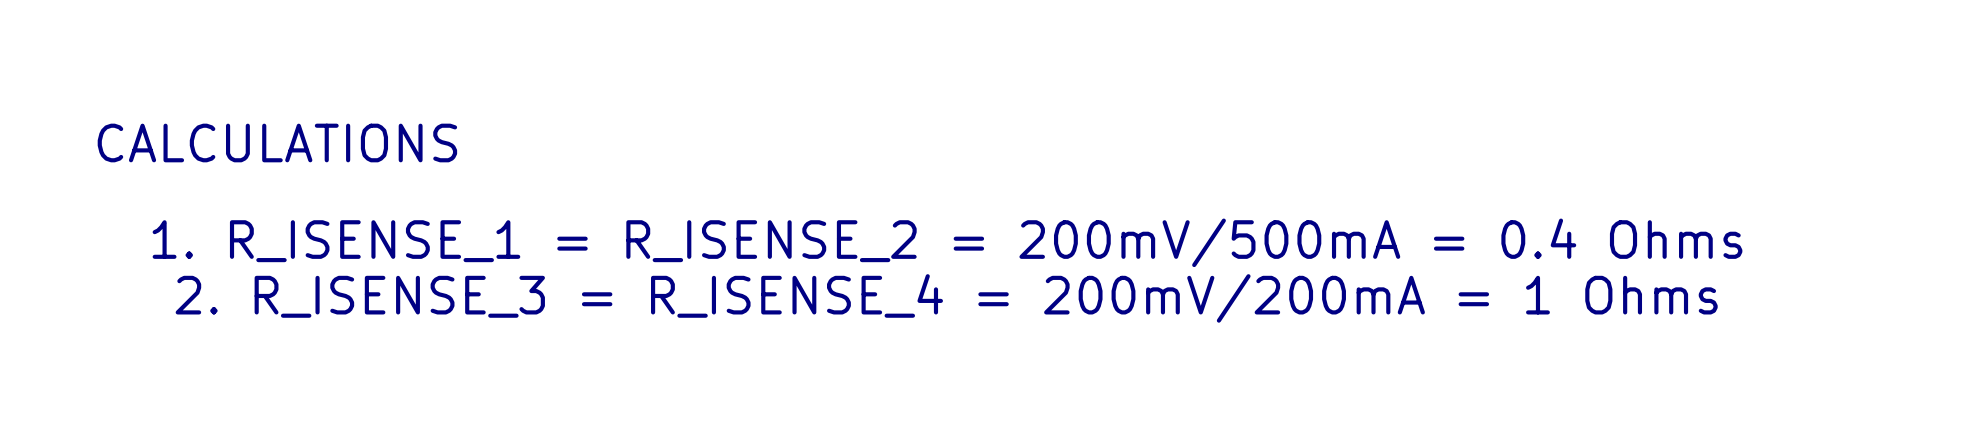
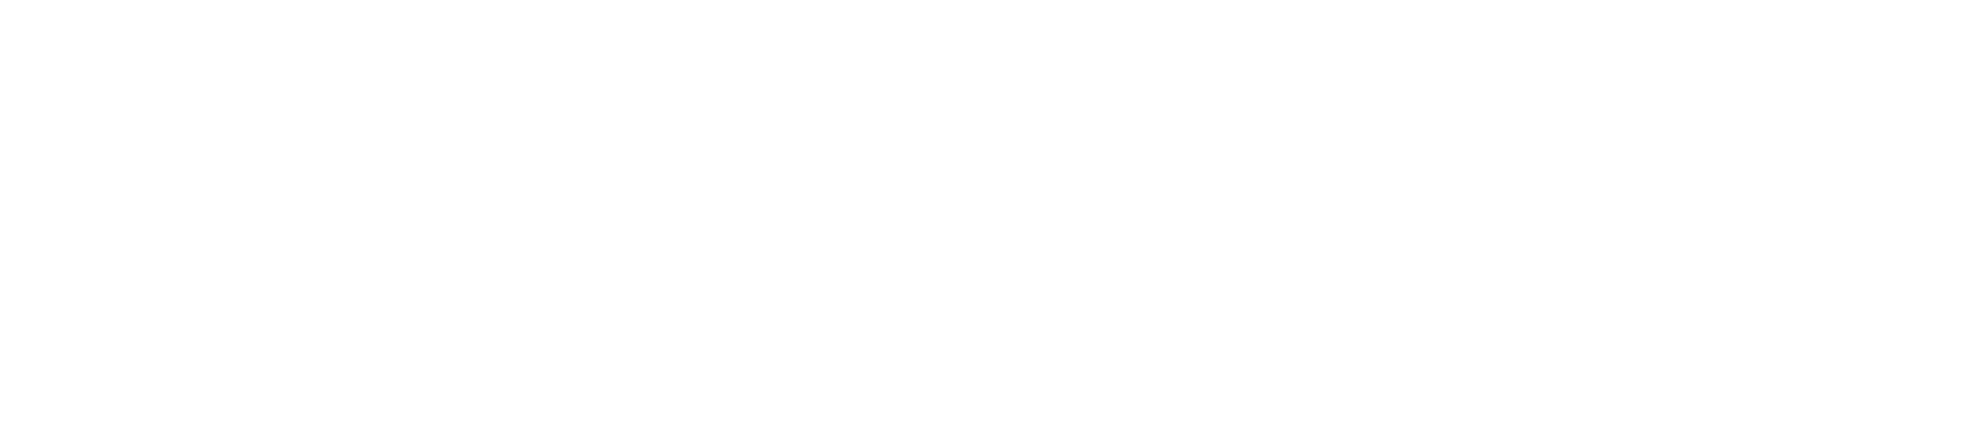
text: CALCULATIONS (277, 142) -> none
text: 1. R_ISENSE_1 = R_ISENSE_2 = 200mV/500mA = 0.4 Ohms (947, 242) -> none
text: 2. R_ISENSE_3 = R_ISENSE_4 = 200mV/200mA = 1 Ohms (946, 298) -> none

